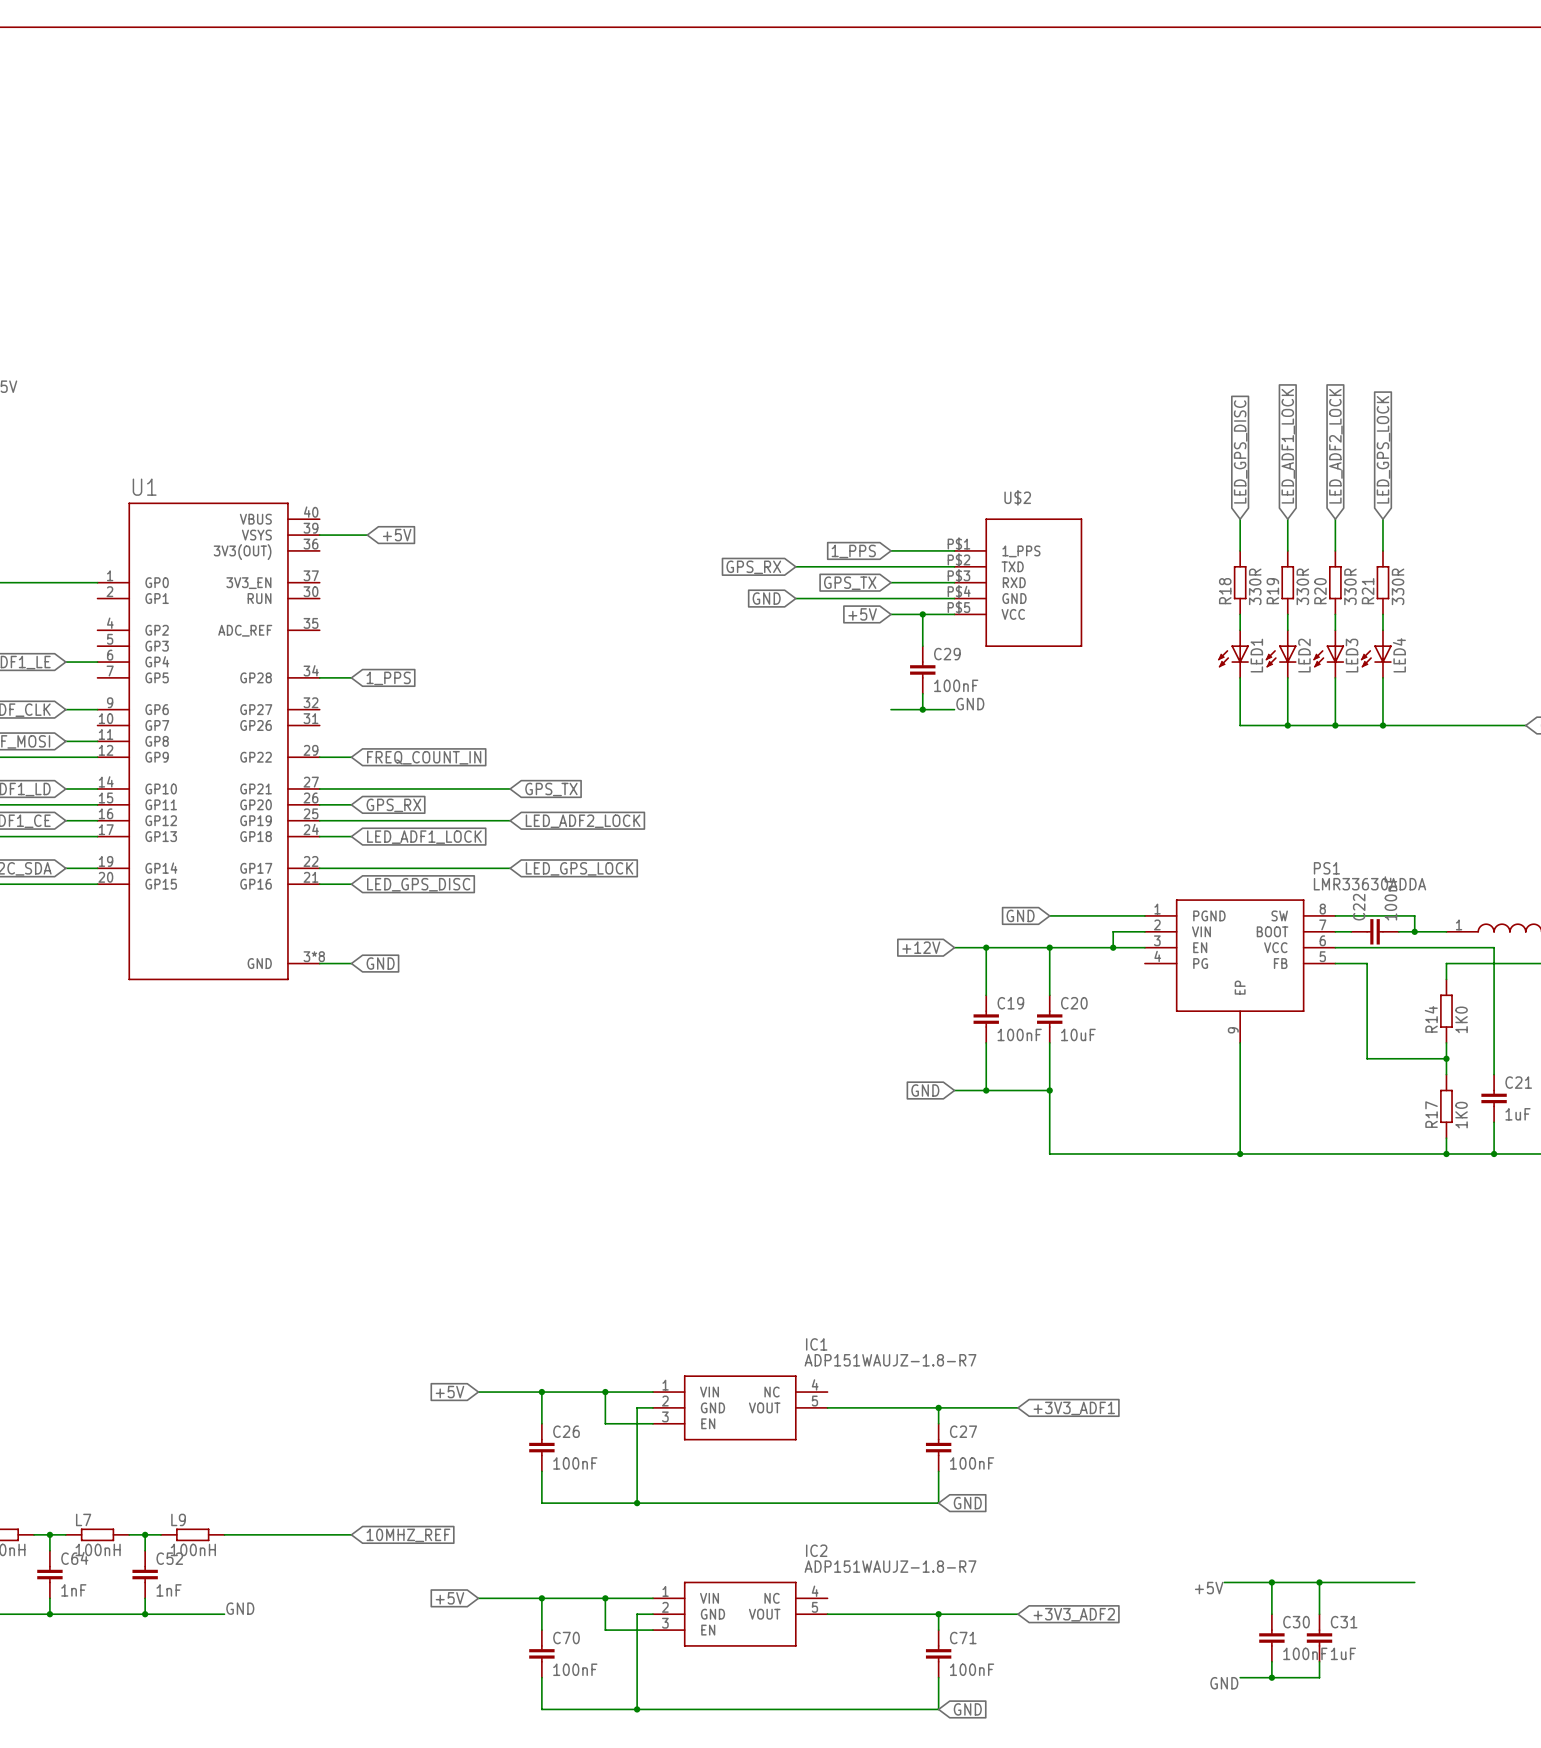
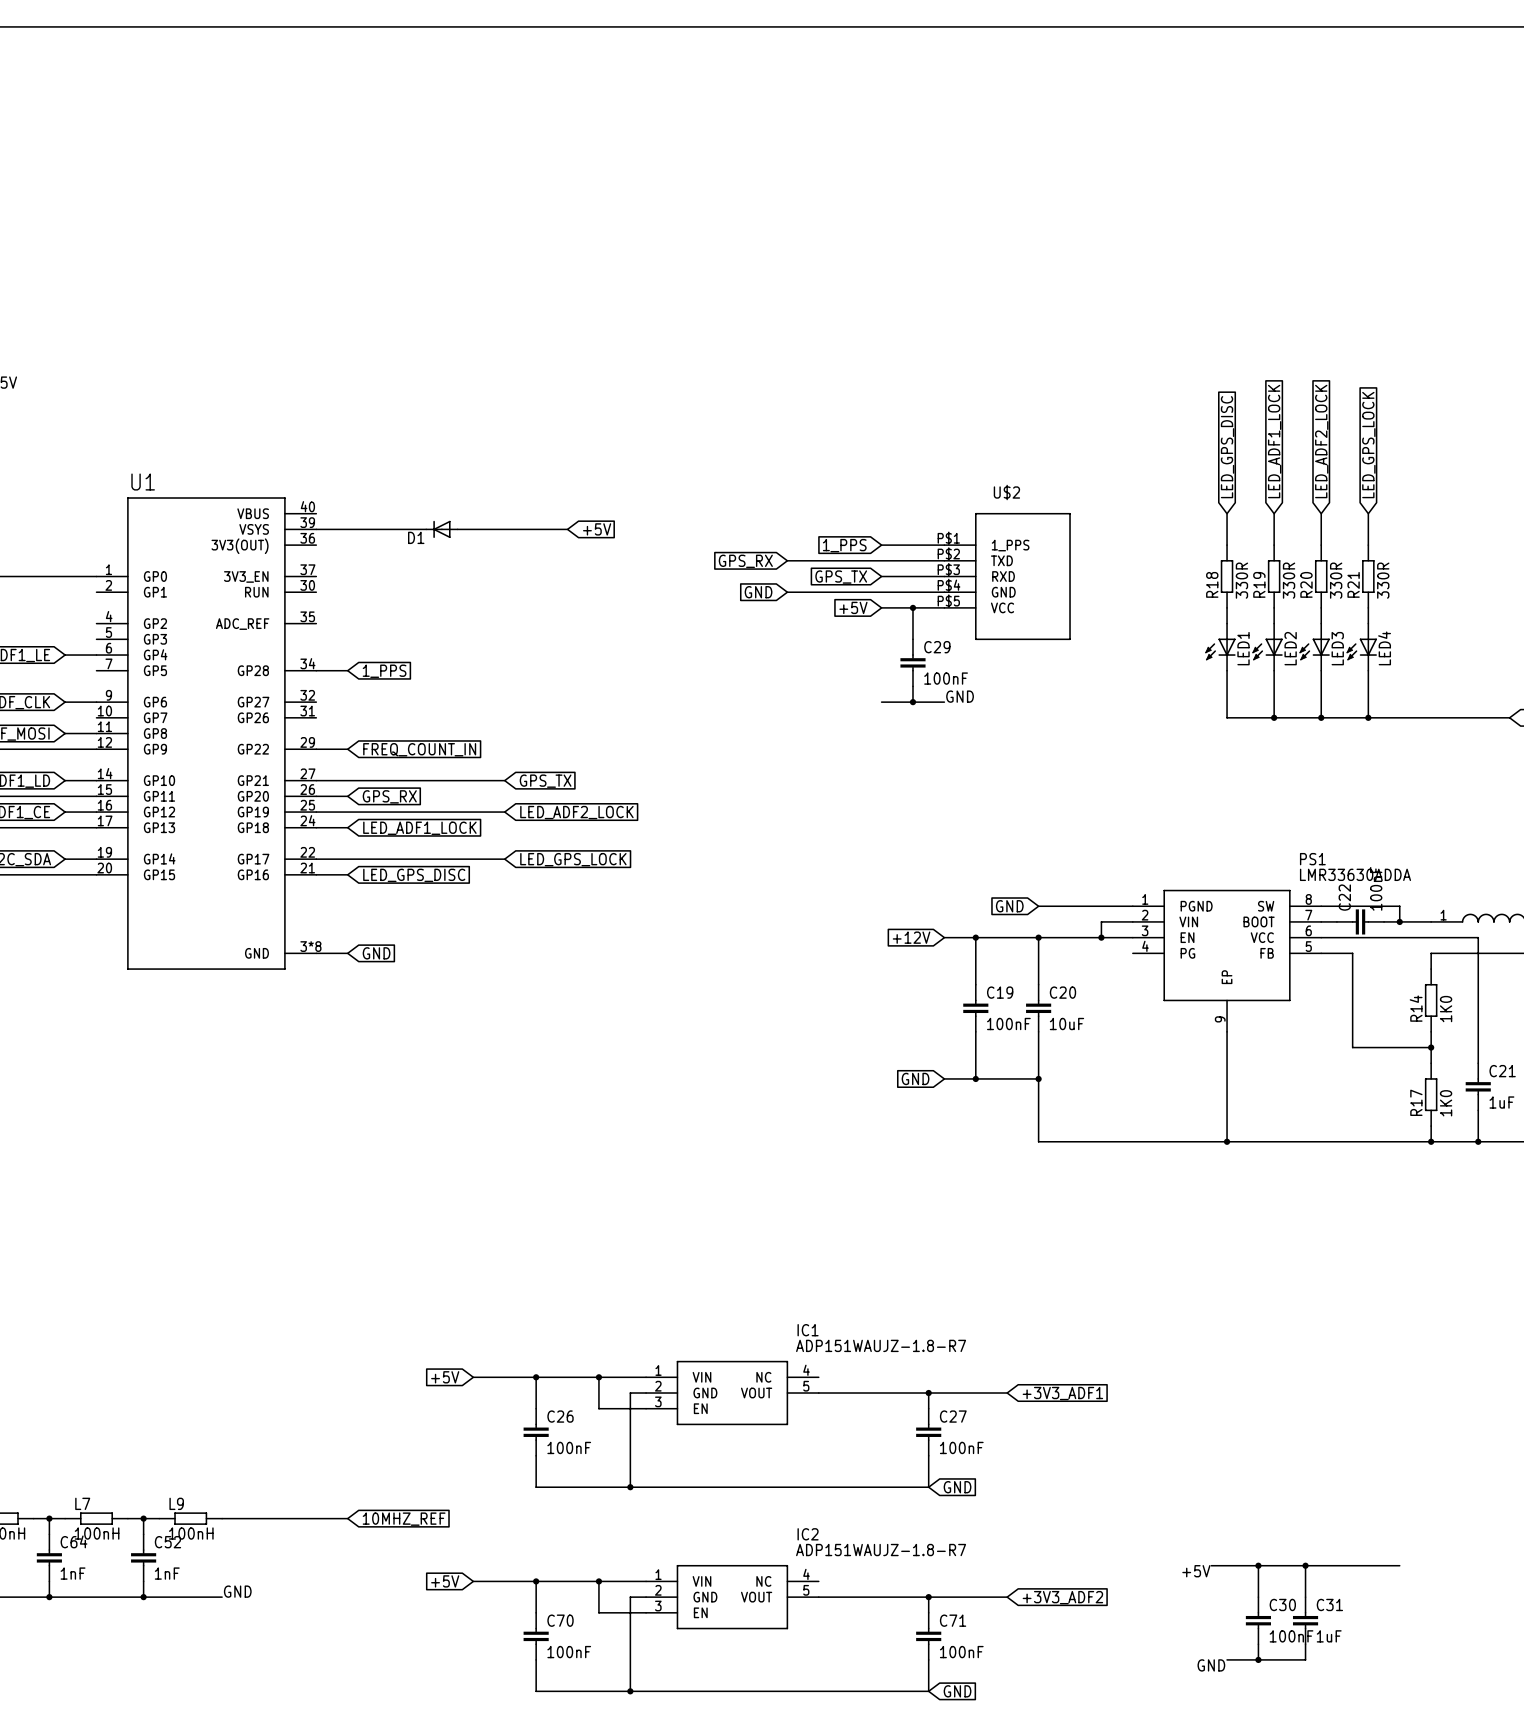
wire: none -> (363, 529) (426, 529)
global label: +5V (397, 535) -> none
D1: none -> (441, 529)
wire: none -> (457, 529) (567, 529)
global label: none -> +5V (597, 529)

